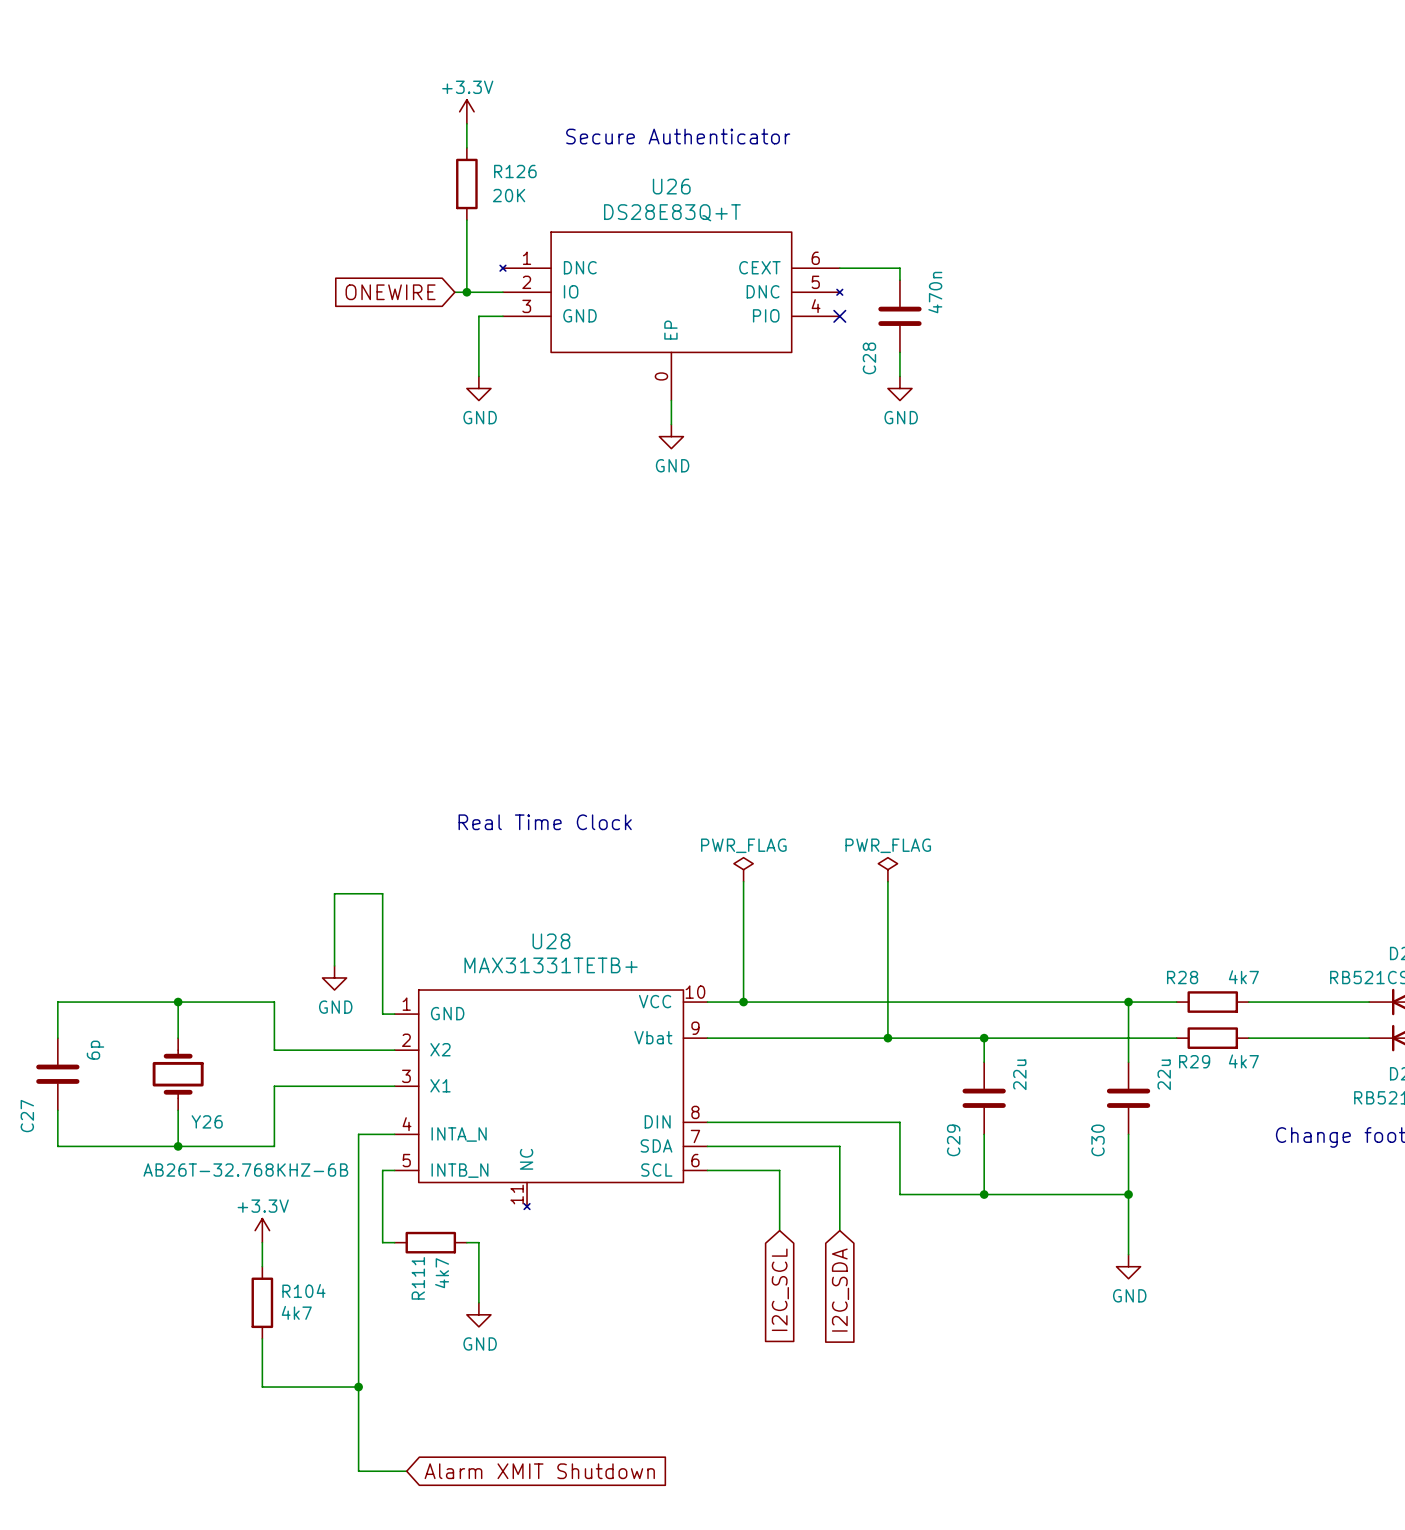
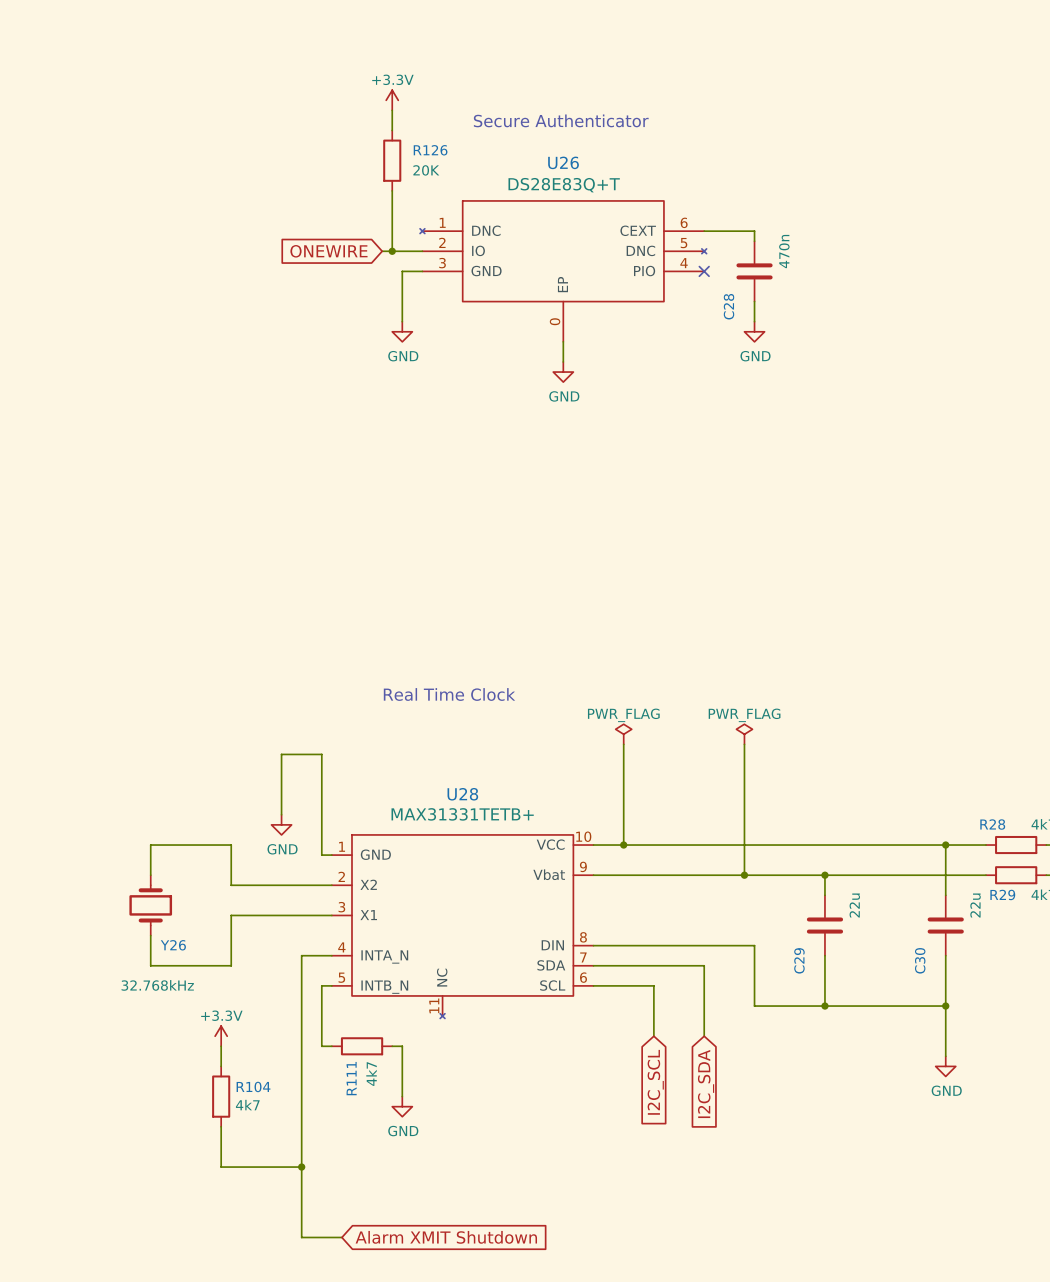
wire: (178, 1002) (57, 1002) (57, 1038) -> none
junction: (178, 1002) -> none
C27: 6p (57, 1074) -> none
wire: (57, 1110) (57, 1146) (178, 1146) -> none
junction: (178, 1146) -> none
Y26 value: AB26T-32.768KHZ-6B (245, 1170) -> 32.768kHz (157, 985)

